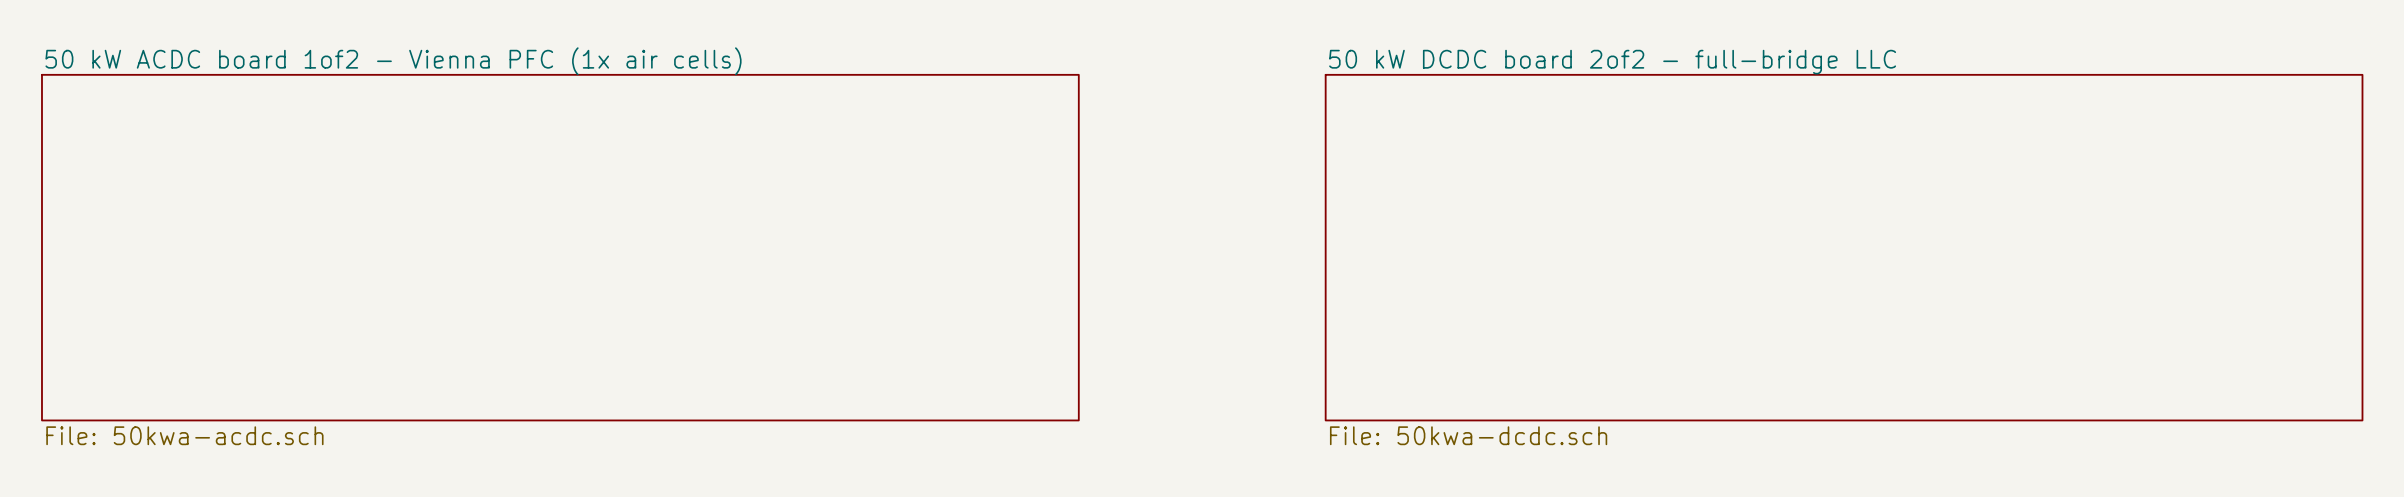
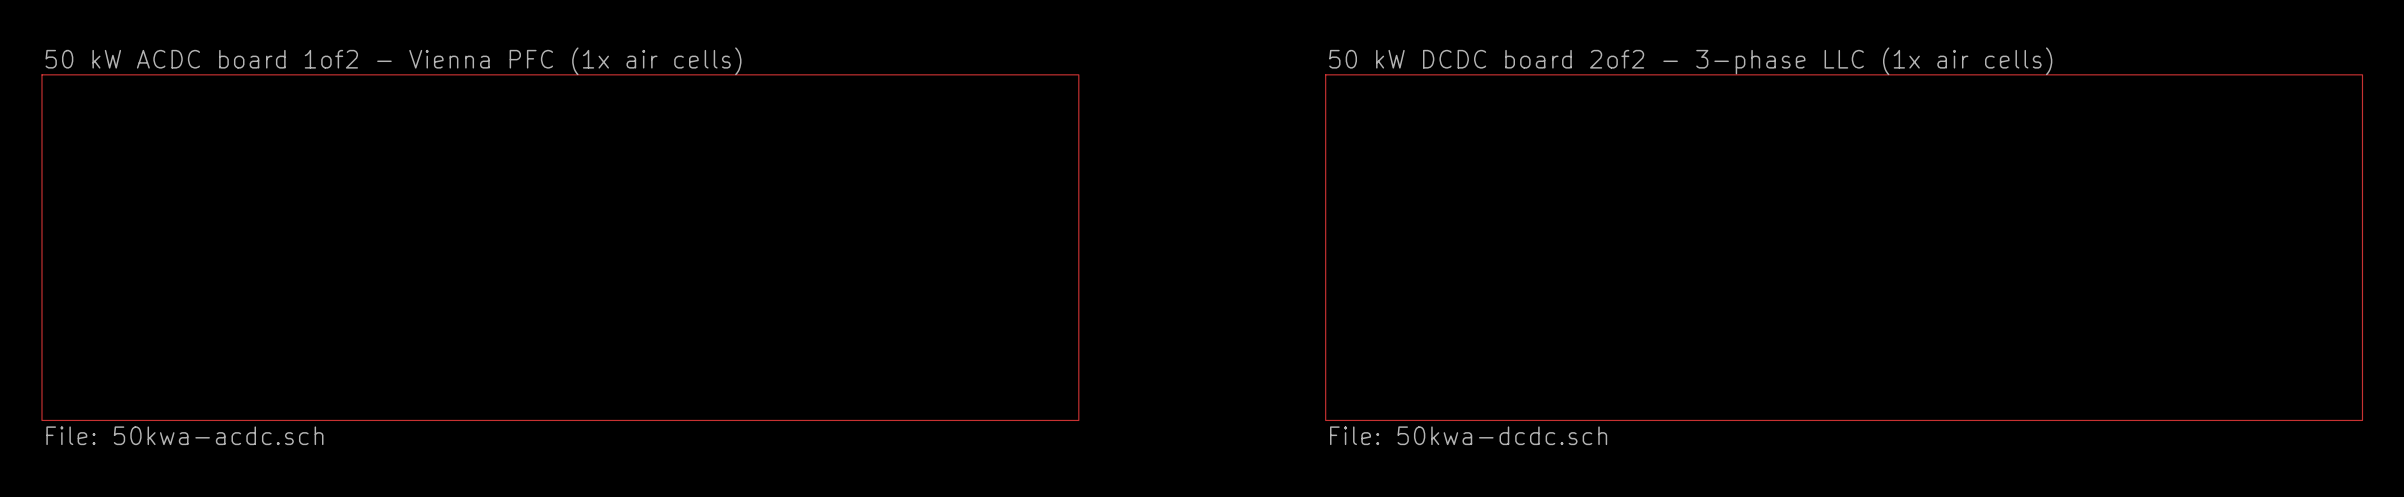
sheet 50 kW DCDC board 2of2 - full-bridge LLC name: 50 kW DCDC board 2of2 - full-bridge LLC (1612, 62) -> 50 kW DCDC board 2of2 - 3-phase LLC (1x air cells) (1690, 61)

